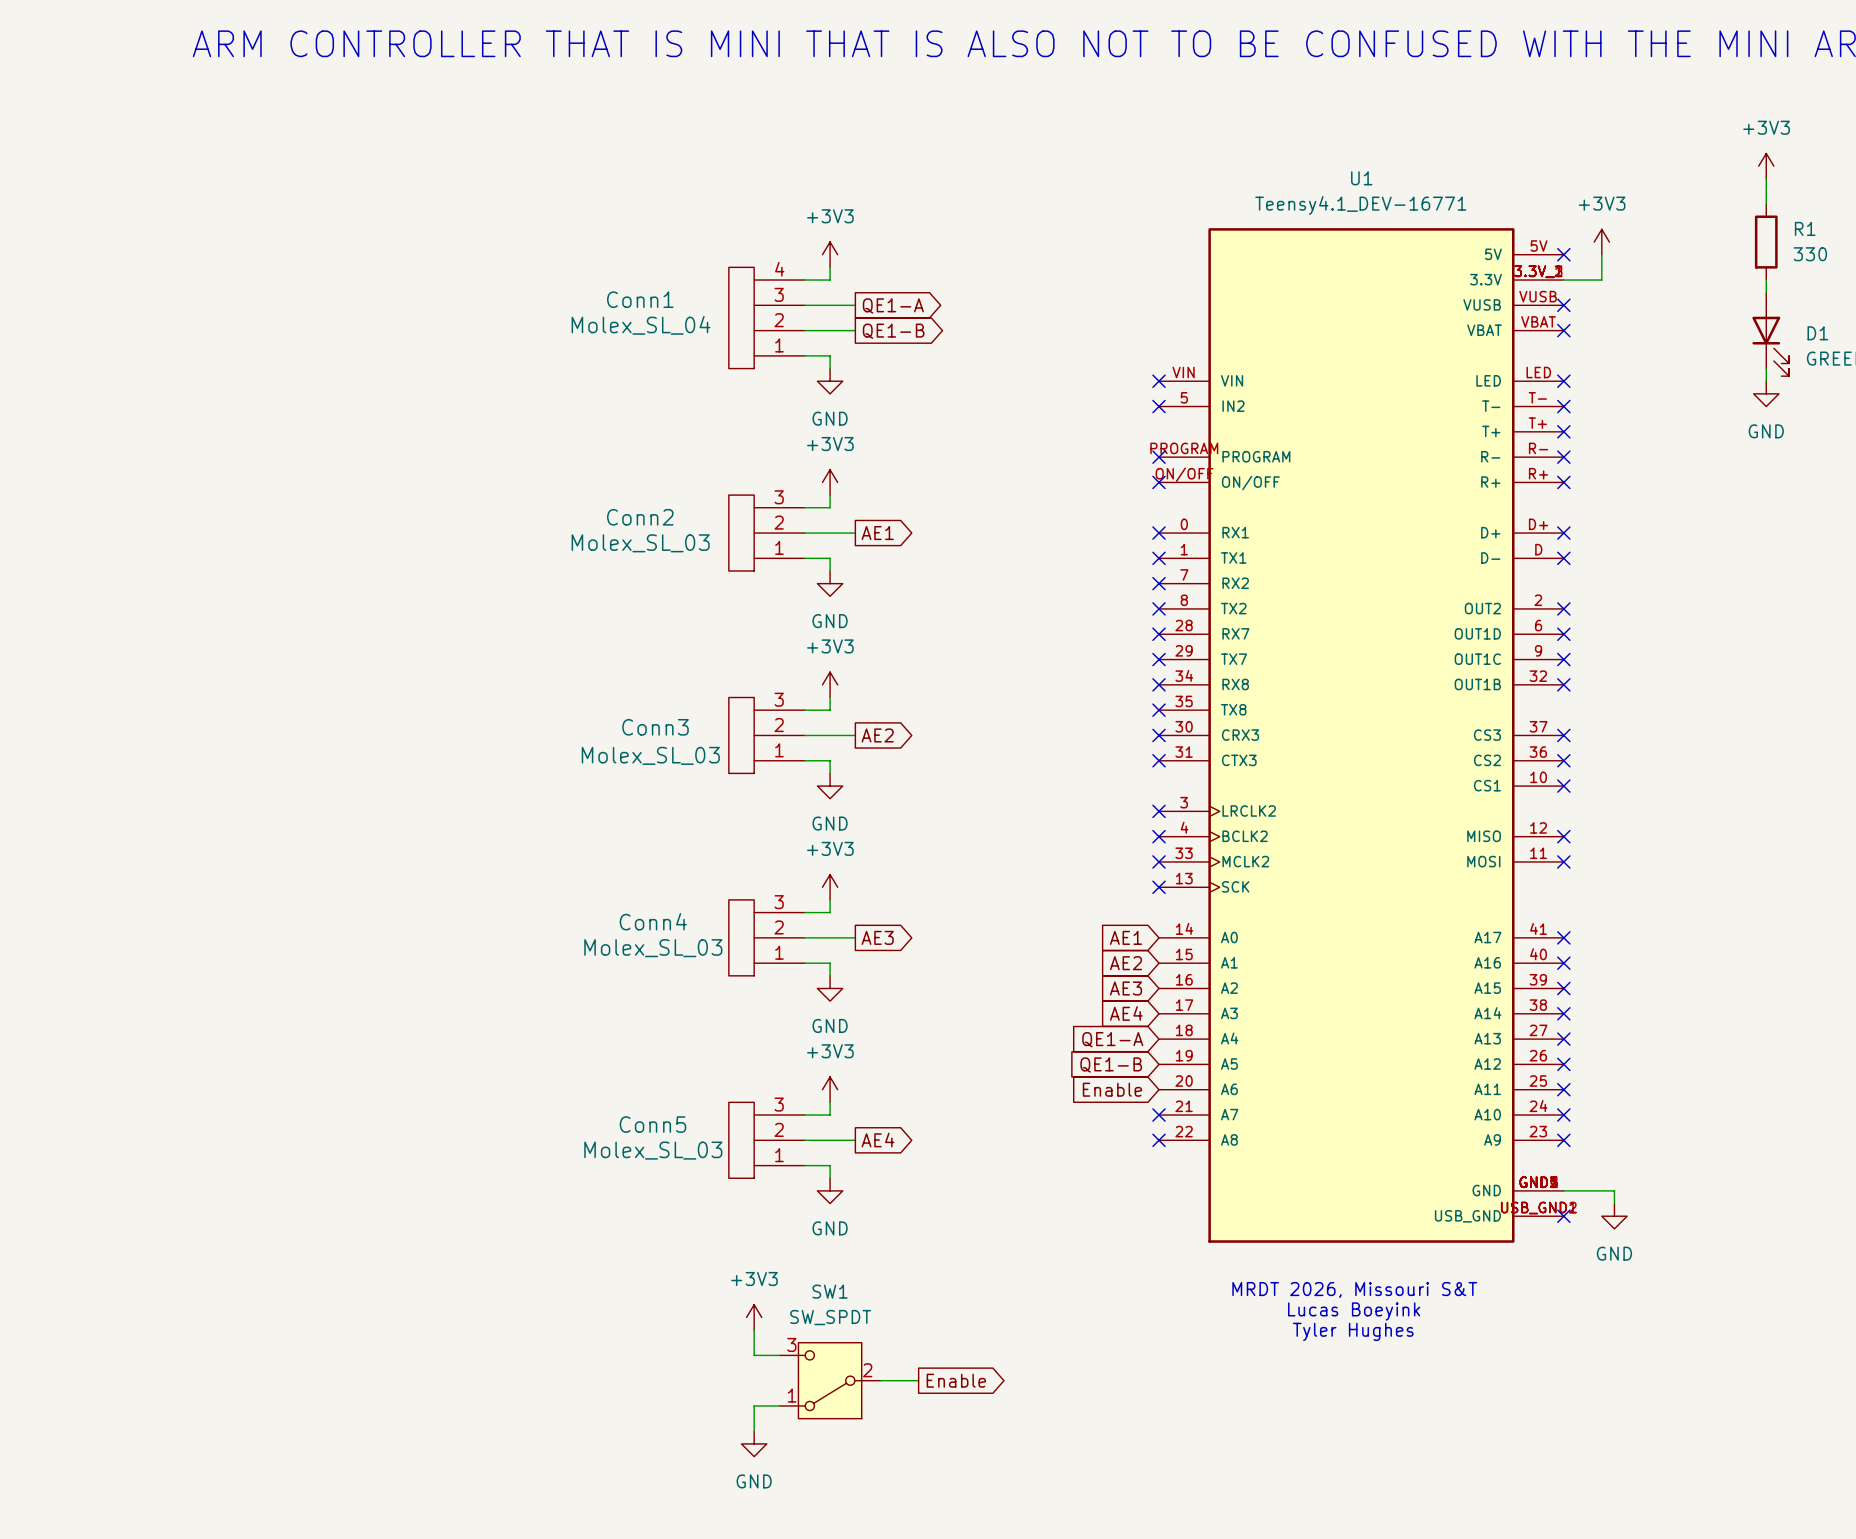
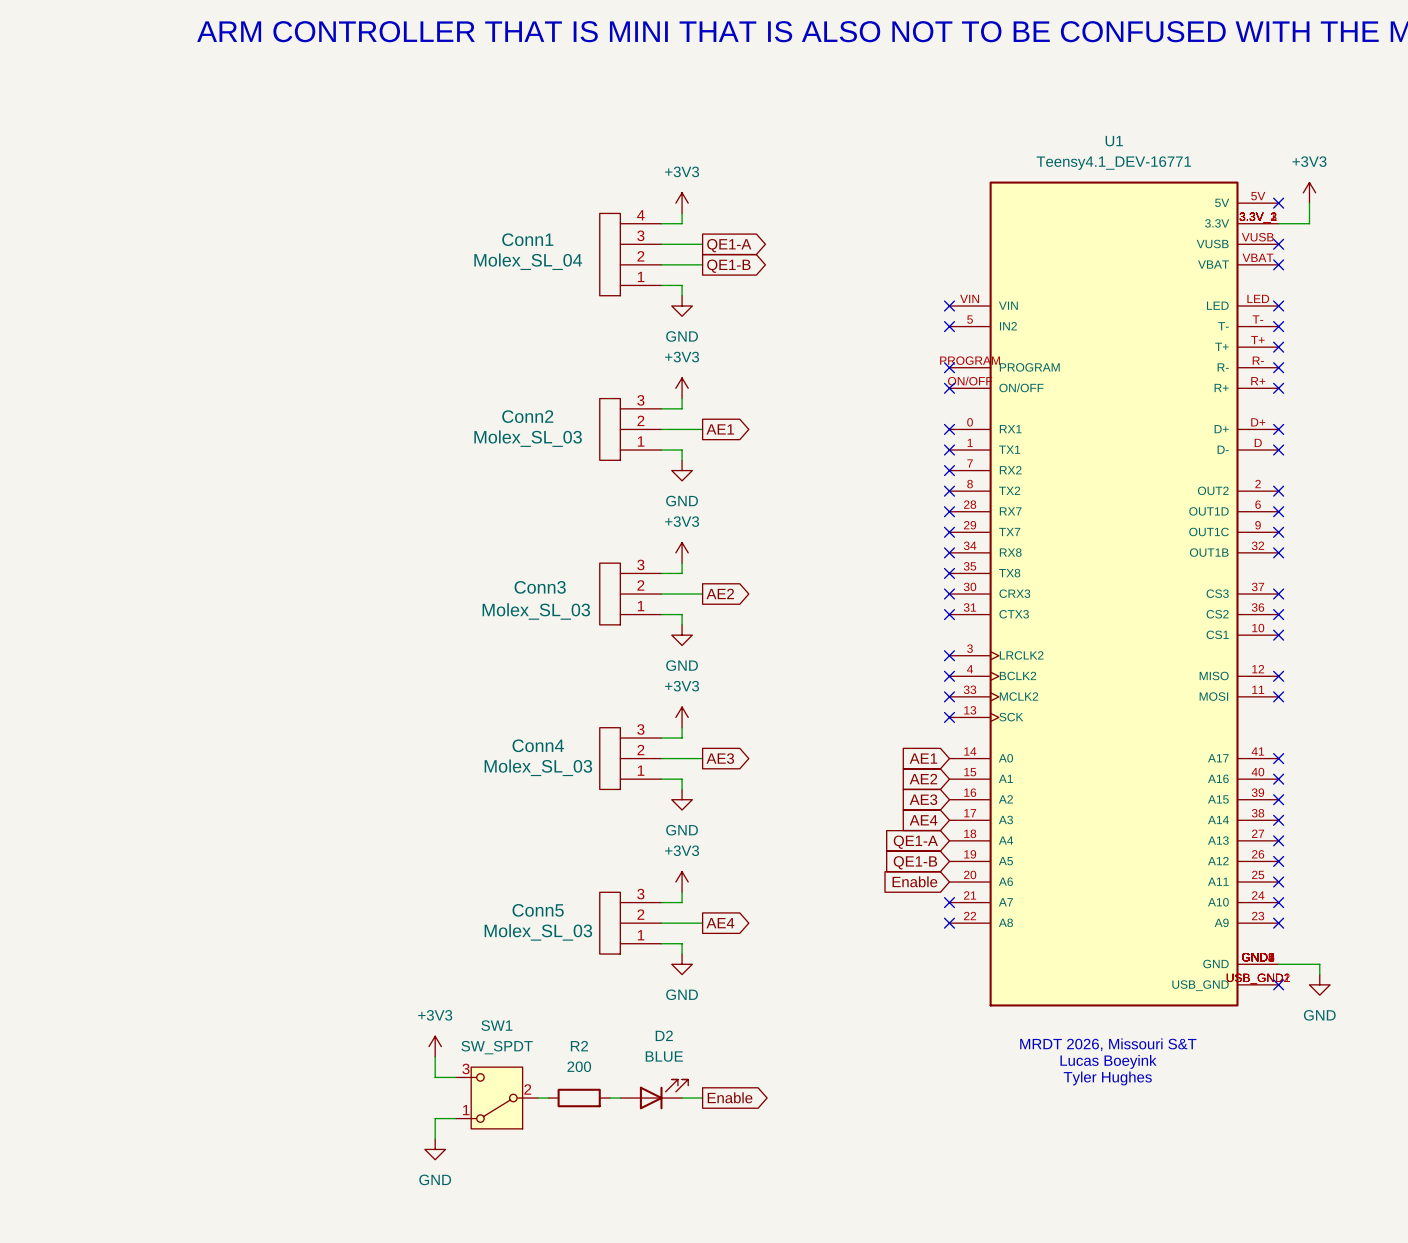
power symbol position: +3V3 (754, 1317) -> +3V3 (435, 1046)
wire: (754, 1330) (754, 1355) (779, 1355) -> (435, 1056) (435, 1077) (455, 1077)
D2: none -> BLUE (654, 1094)
wire: none -> (538, 1098) (548, 1098)
R2: none -> 200 (579, 1098)
wire: none -> (610, 1098) (620, 1098)
SW1 position: (830, 1380) -> (496, 1098)
wire: (880, 1380) (918, 1380) -> none
global label position: Enable (956, 1380) -> Enable (730, 1097)
wire: (779, 1405) (754, 1405) (754, 1431) -> (455, 1118) (435, 1118) (435, 1139)
power symbol position: GND (754, 1443) -> GND (435, 1149)

